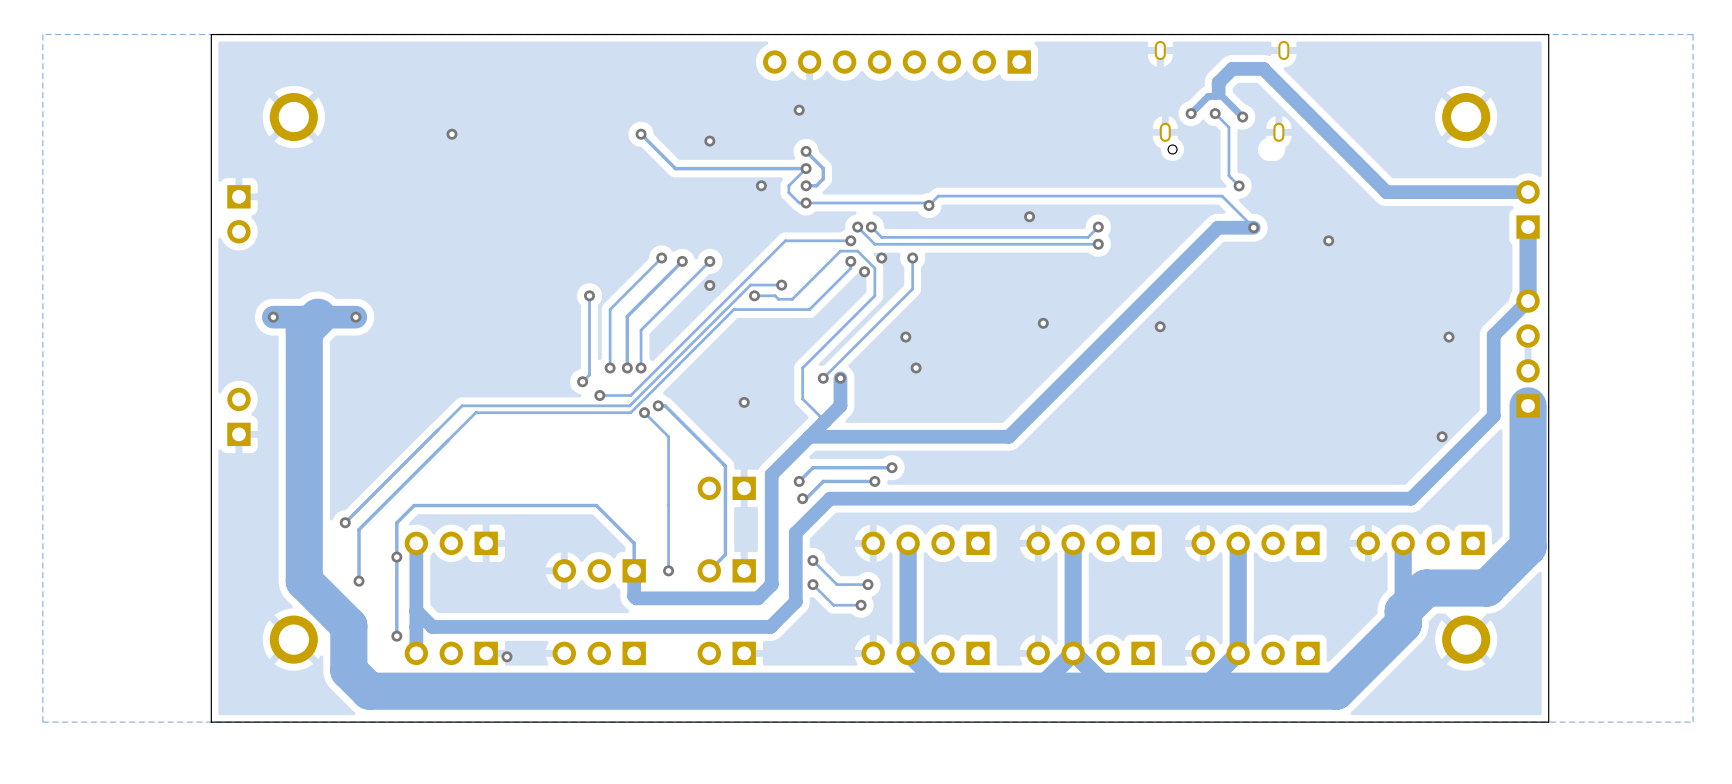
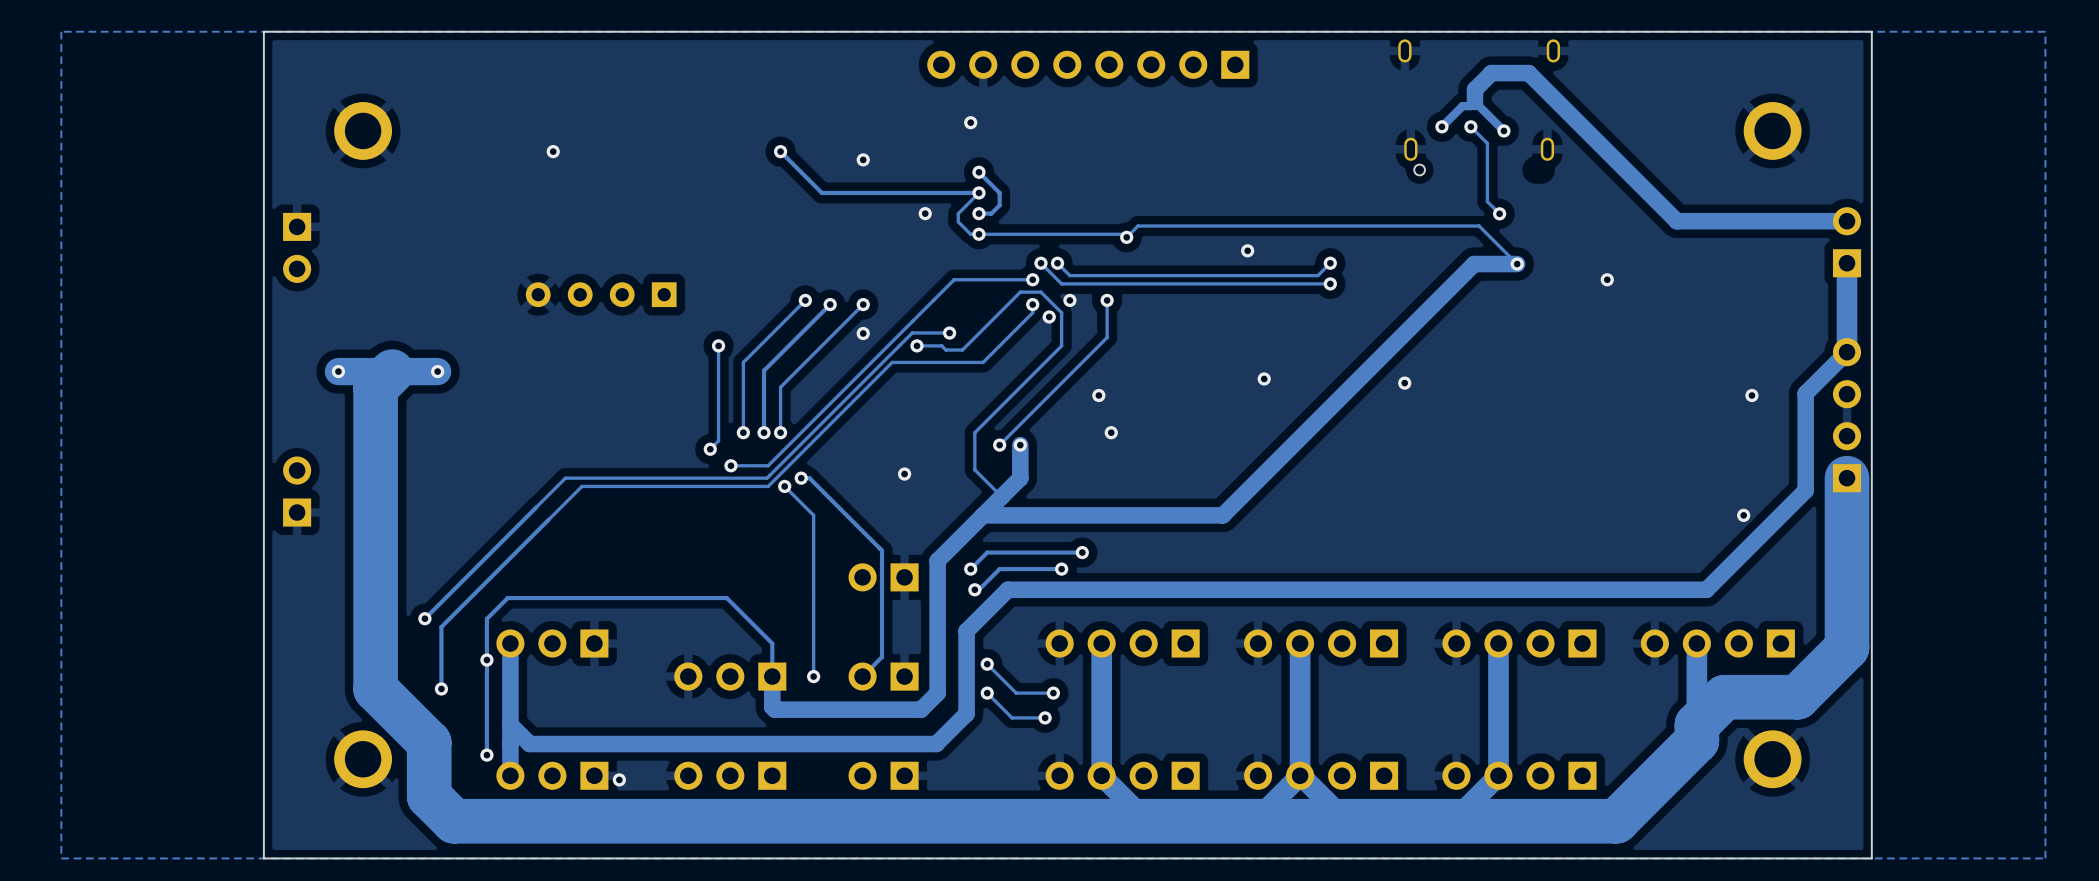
part: none -> (601, 294)

